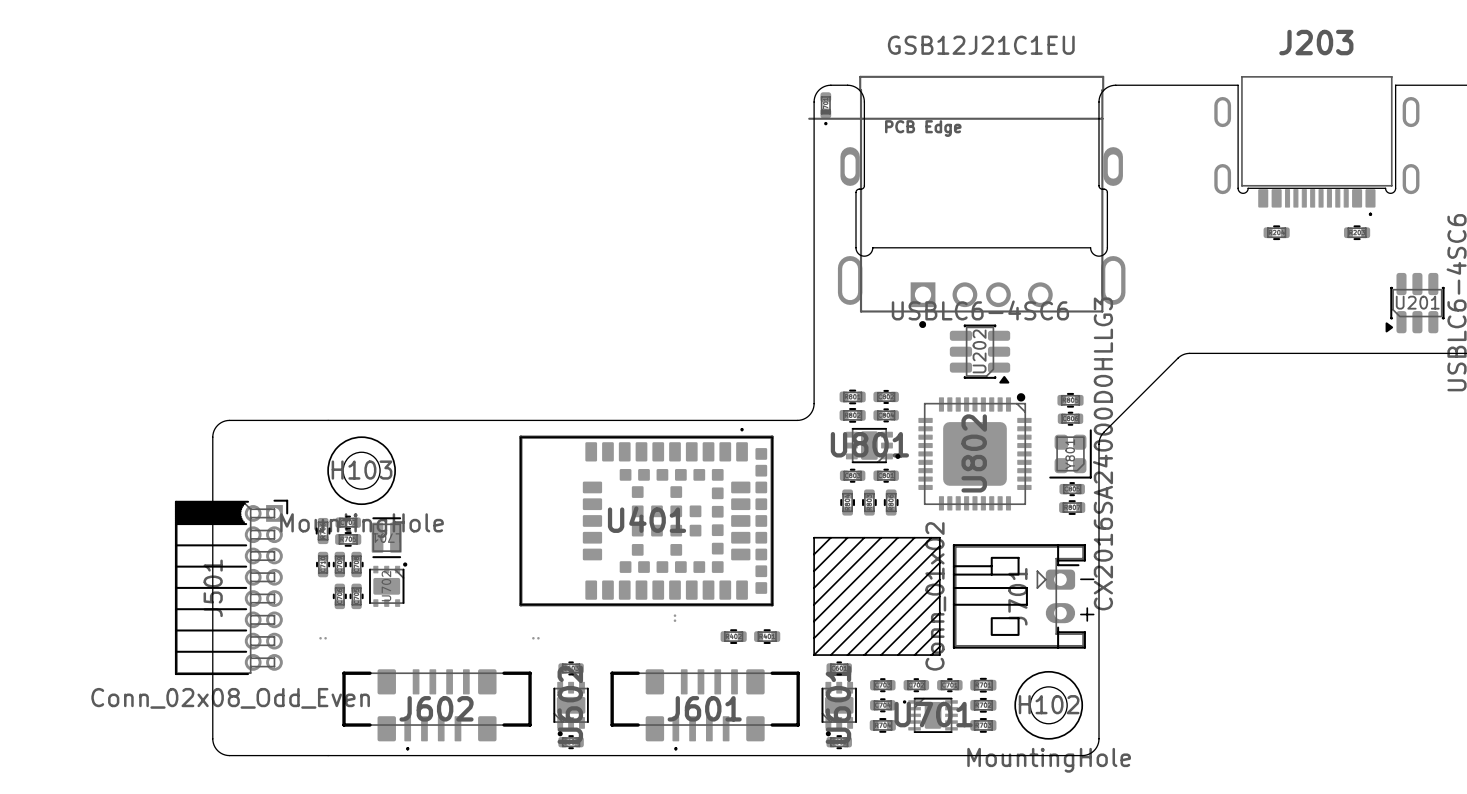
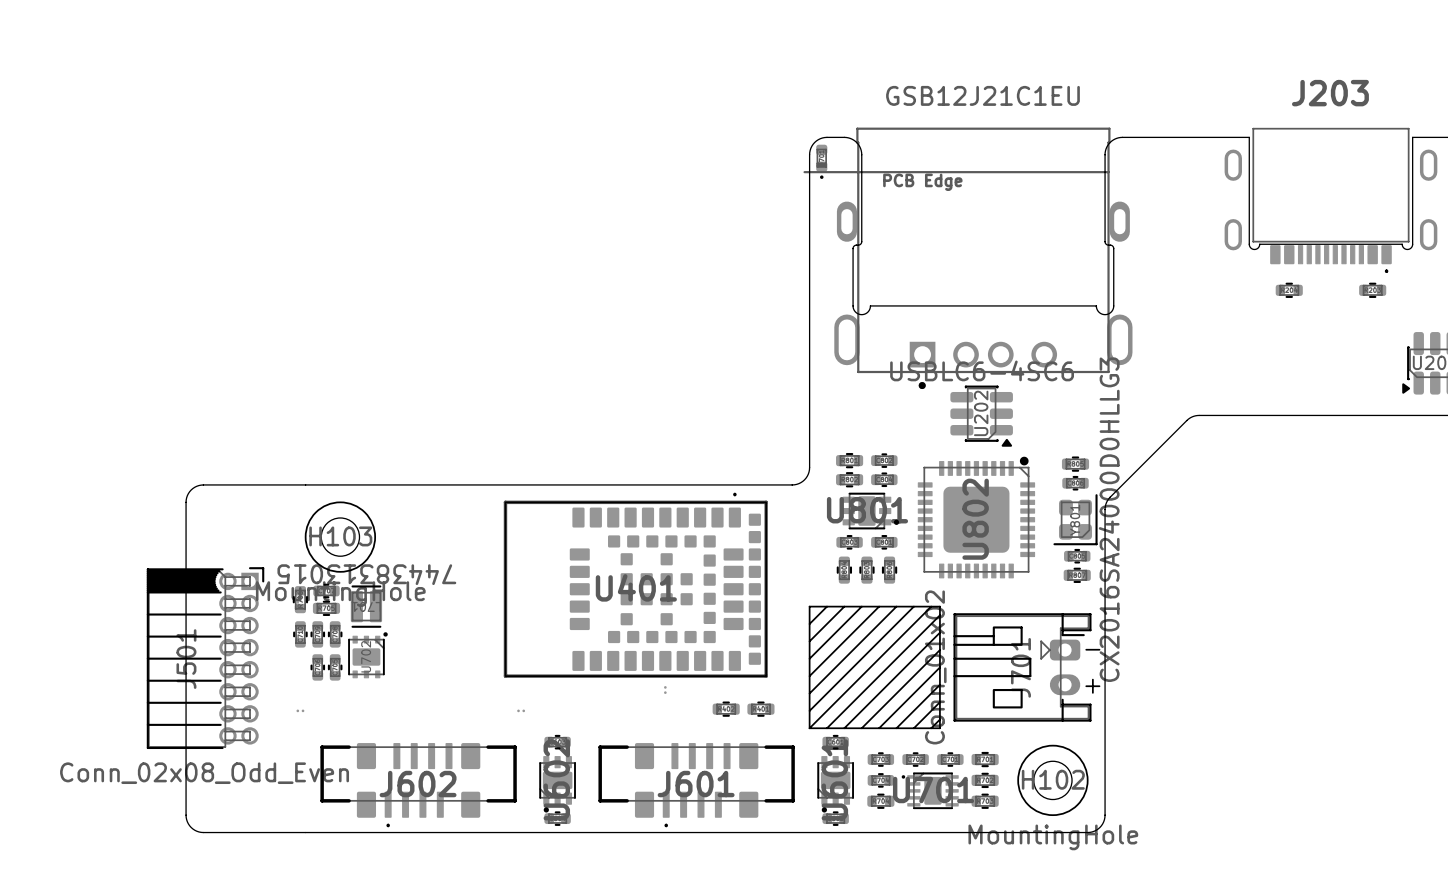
part value: none -> 74438313015 (366, 574)

